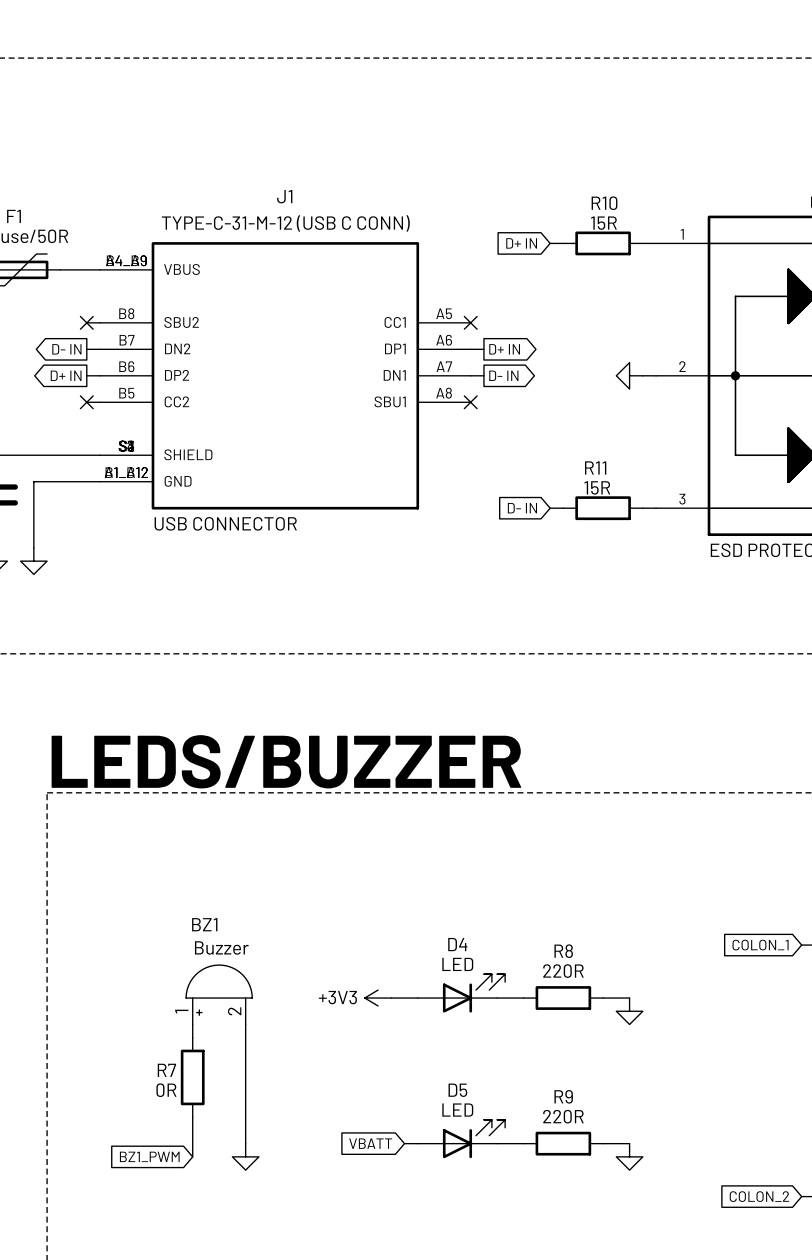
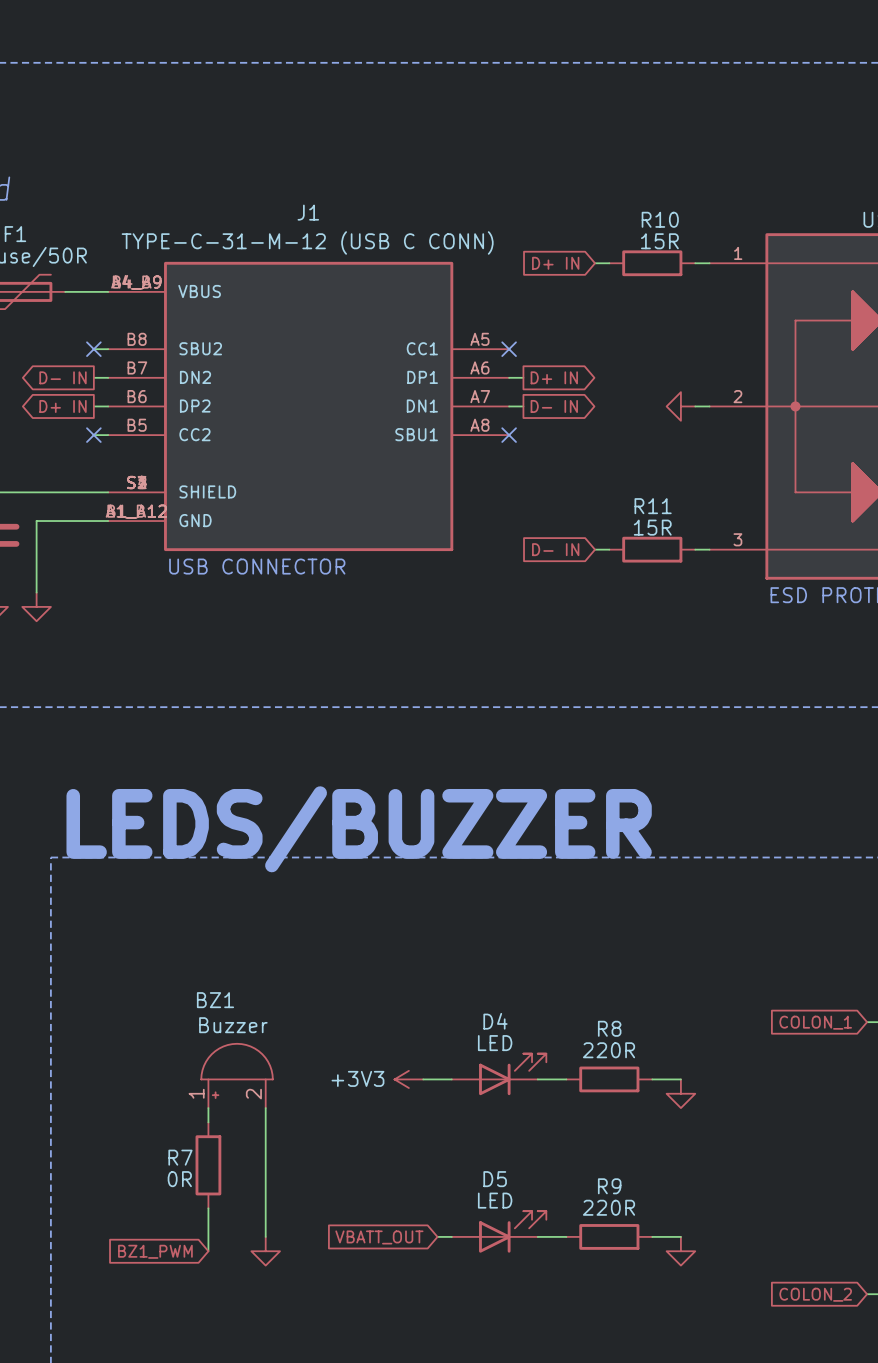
global label: VBATT (370, 1143) -> VBATT_OUT (379, 1237)

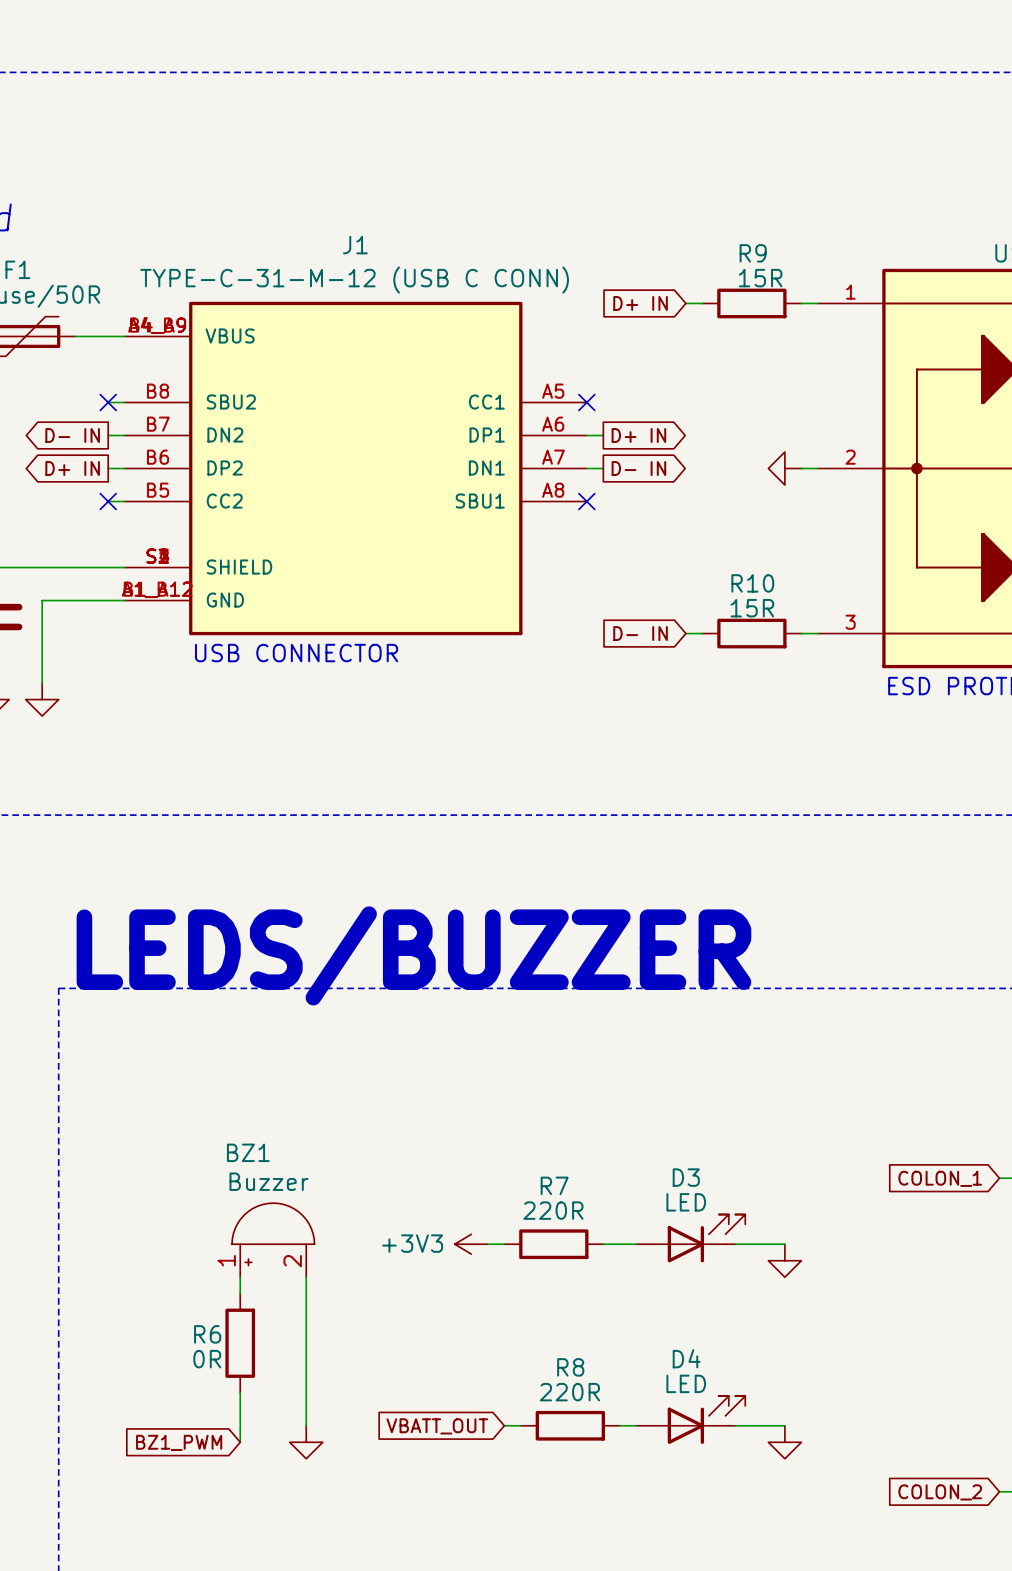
R10 name: R10 (660, 219) -> R9 (753, 253)
R11 name: R11 (653, 506) -> R10 (752, 583)
D4 position: (499, 1074) -> (690, 1419)
D3: none -> LED (690, 1238)
R7: none -> 220R (553, 1244)
R8 position: (609, 1079) -> (570, 1425)
R7 name: R7 (180, 1157) -> R6 (207, 1334)
D5: LED (499, 1231) -> none
R9: 220R (609, 1236) -> none

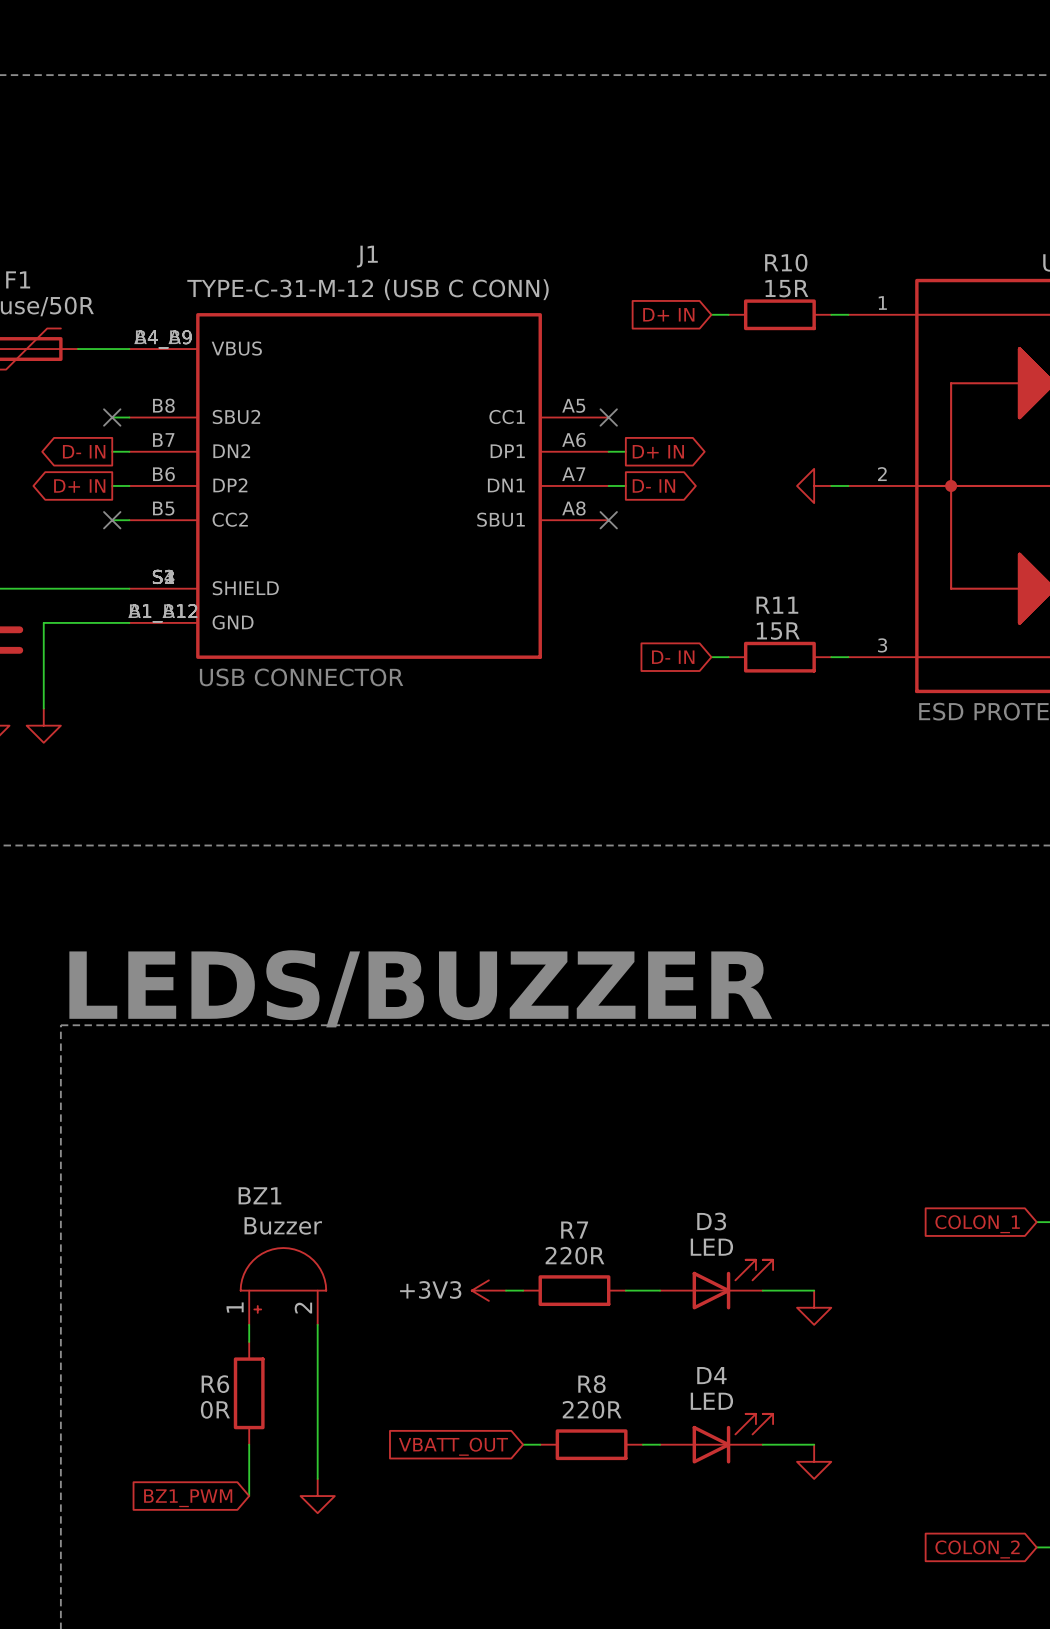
R9 name: R9 (753, 253) -> R10 (786, 262)
R10 name: R10 (752, 583) -> R11 (777, 605)
D4 position: (690, 1419) -> (716, 1438)
wire: (504, 1425) (520, 1425) -> (523, 1444) (540, 1444)
R8 position: (570, 1425) -> (591, 1444)
wire: (619, 1425) (636, 1425) -> (642, 1444) (660, 1444)
wire: (735, 1425) (784, 1425) -> (762, 1444) (814, 1444)
global label position: VBATT_OUT (437, 1426) -> VBATT_OUT (453, 1446)
power symbol position: (784, 1442) -> (814, 1461)

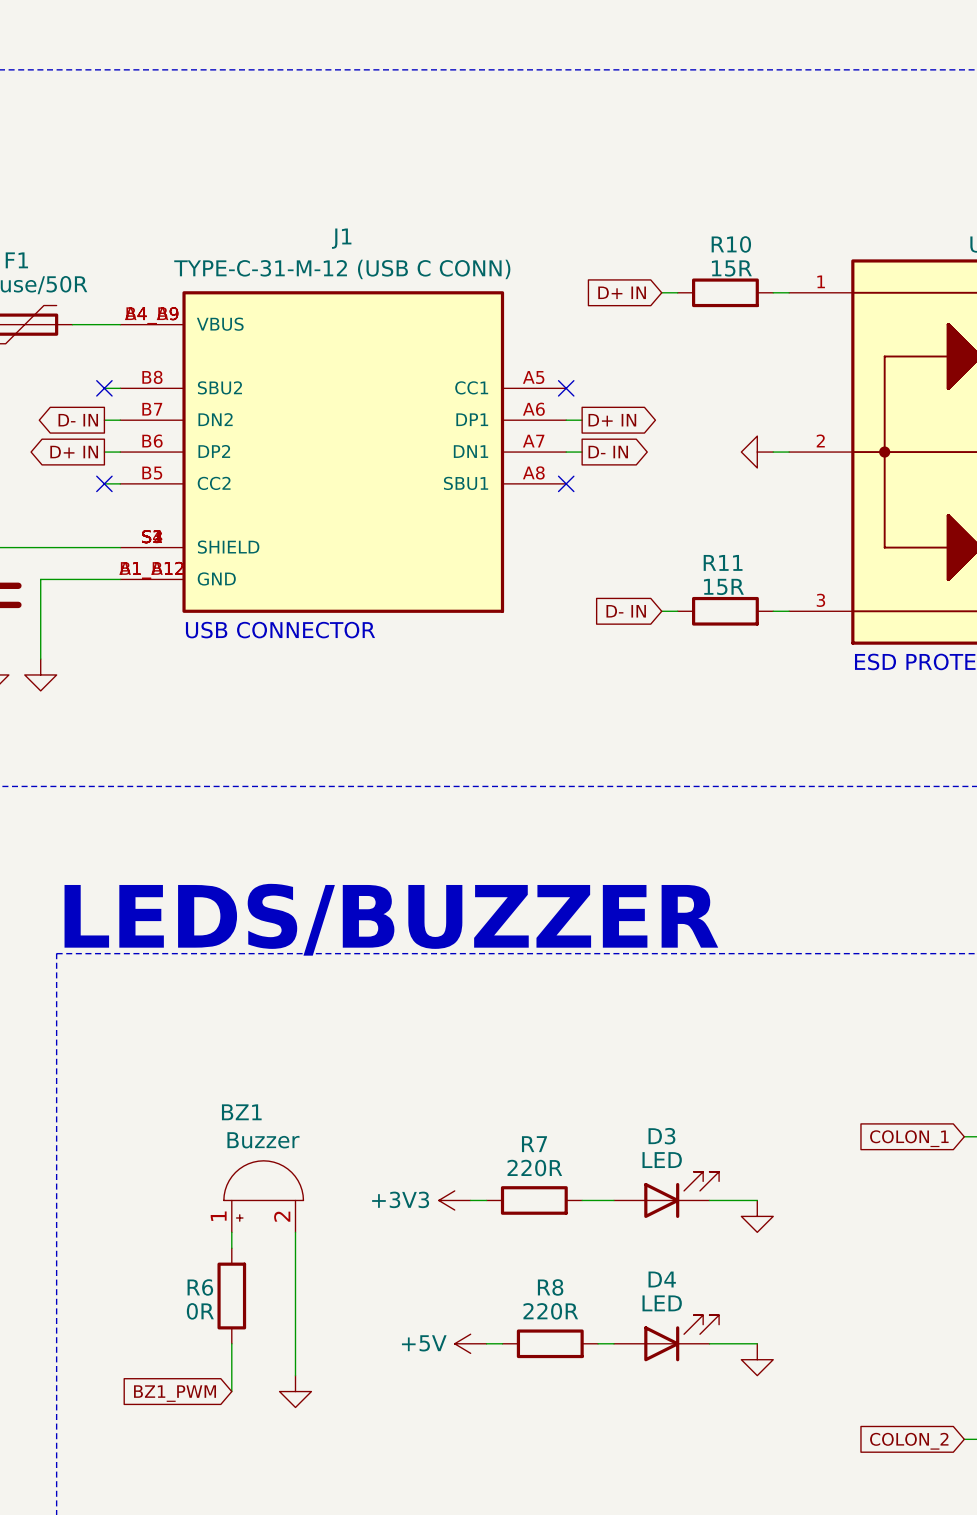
power symbol: none -> +5V (470, 1343)
global label: VBATT_OUT (453, 1446) -> none

